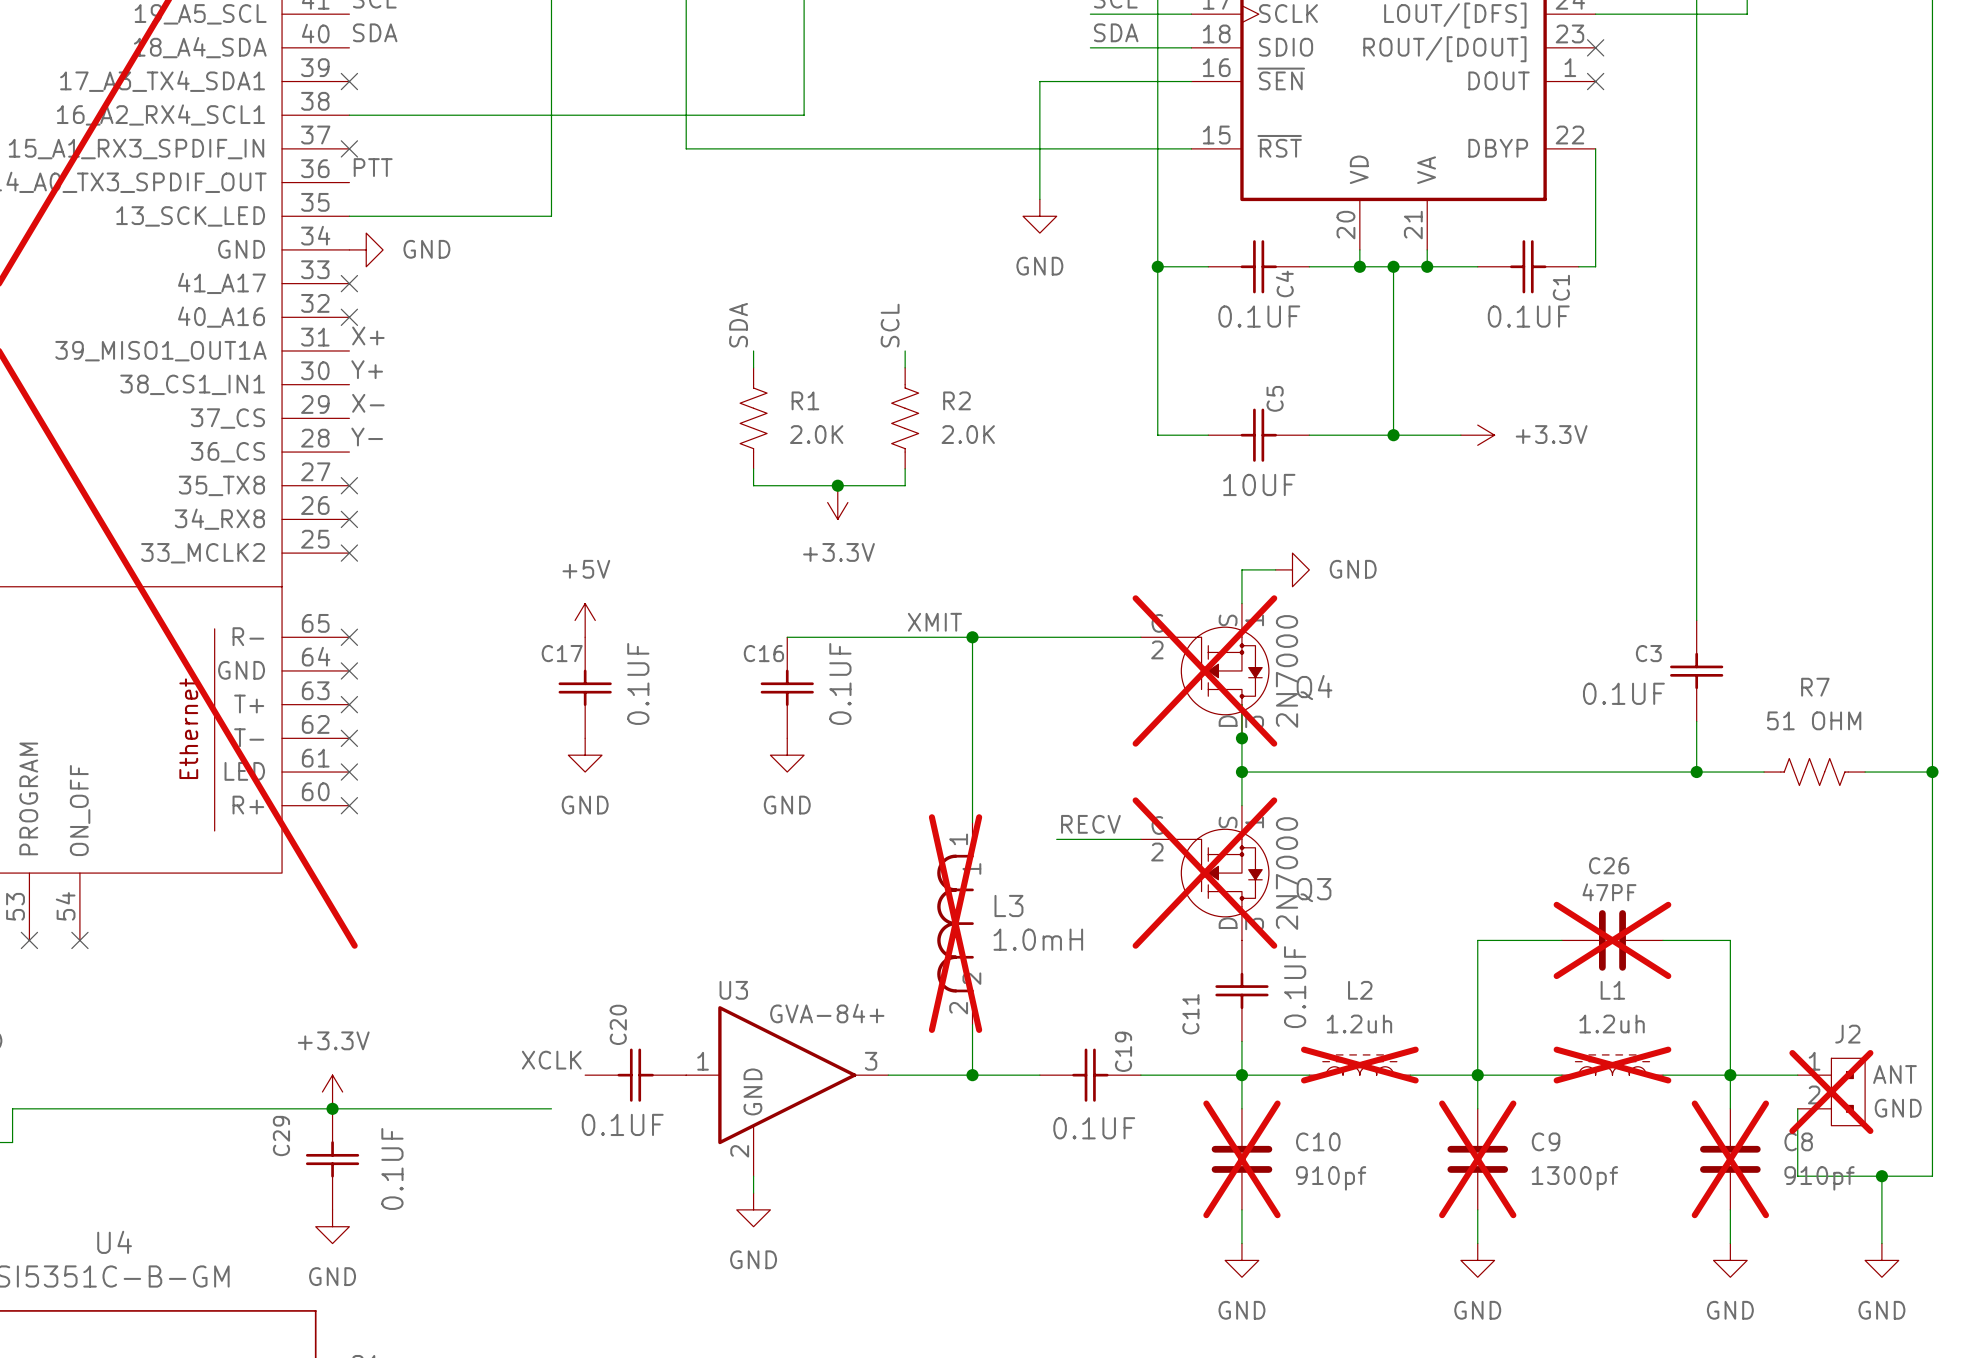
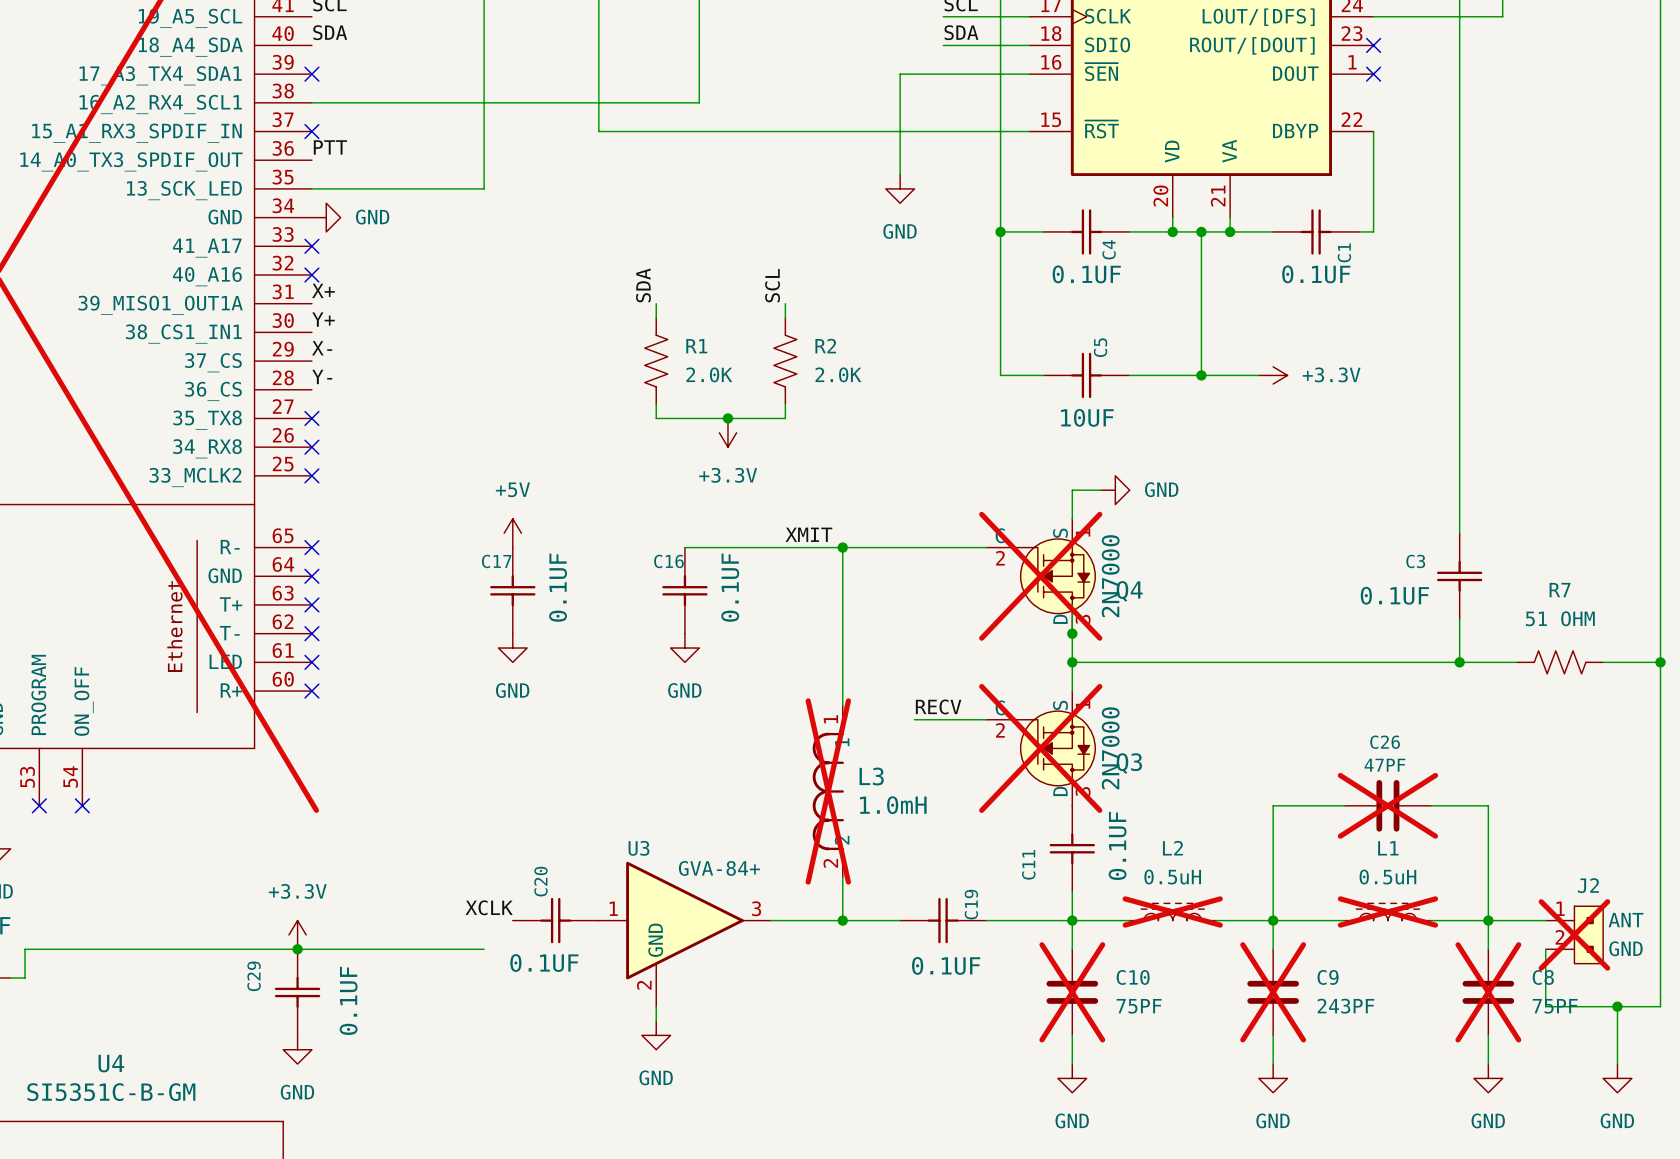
L2 value: 1.2uh (1359, 1024) -> 0.5uH (1172, 877)
L1 value: 1.2uh (1612, 1024) -> 0.5uH (1387, 877)
C10 value: 910pf (1331, 1178) -> 75PF (1139, 1006)
C9 value: 1300pf (1574, 1178) -> 243PF (1345, 1006)
C8 value: 910pf (1819, 1178) -> 75PF (1555, 1006)

